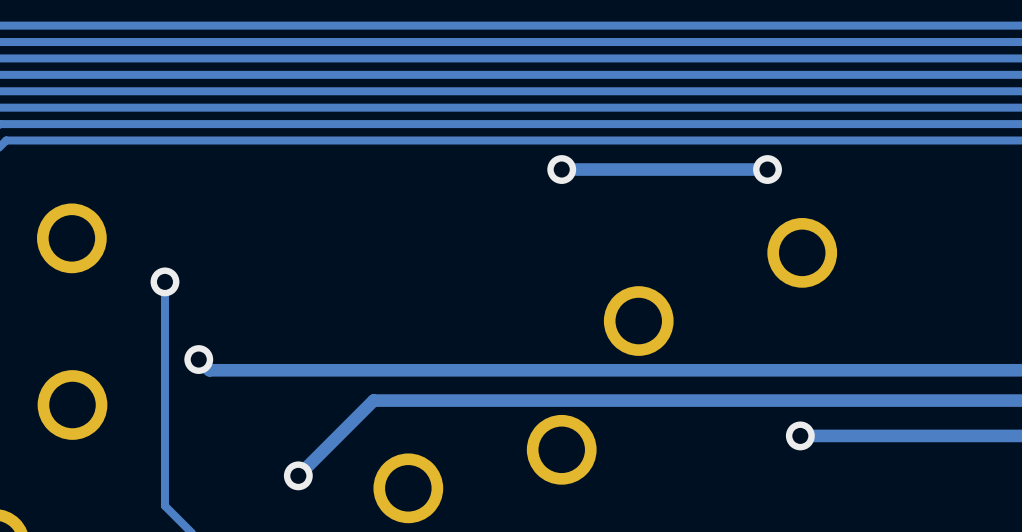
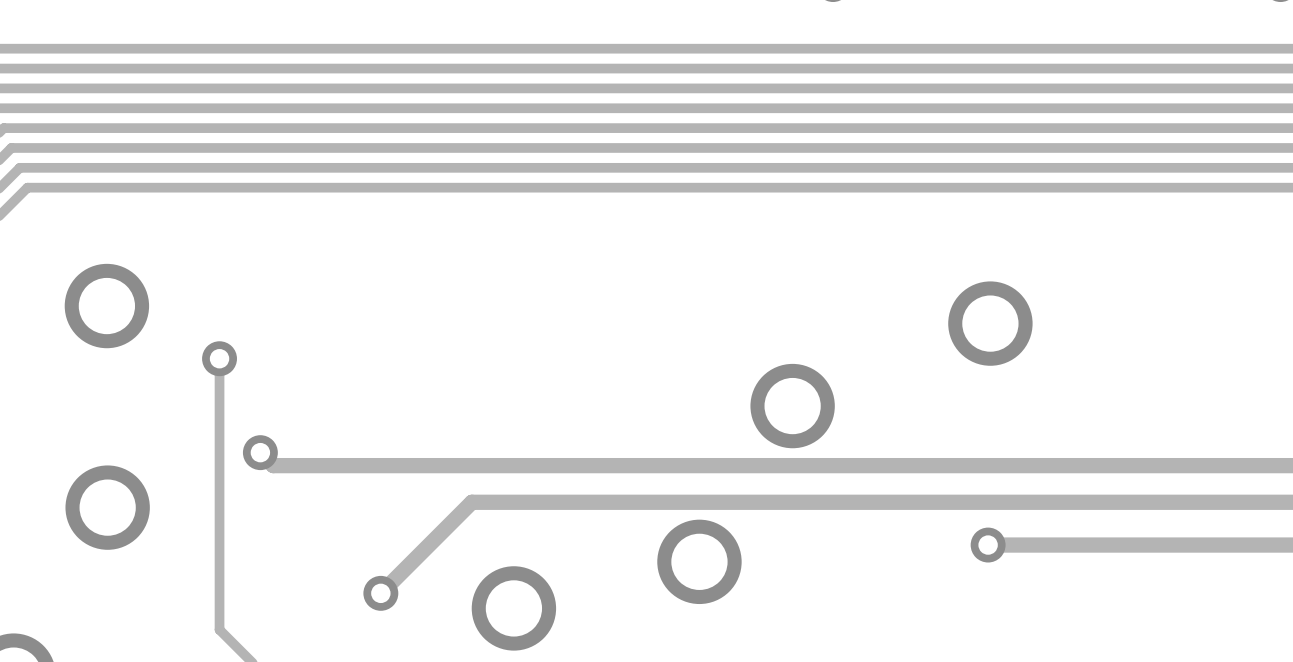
via: (561, 169) -> none
track: (767, 169) (561, 169) -> none
via: (767, 169) -> none

